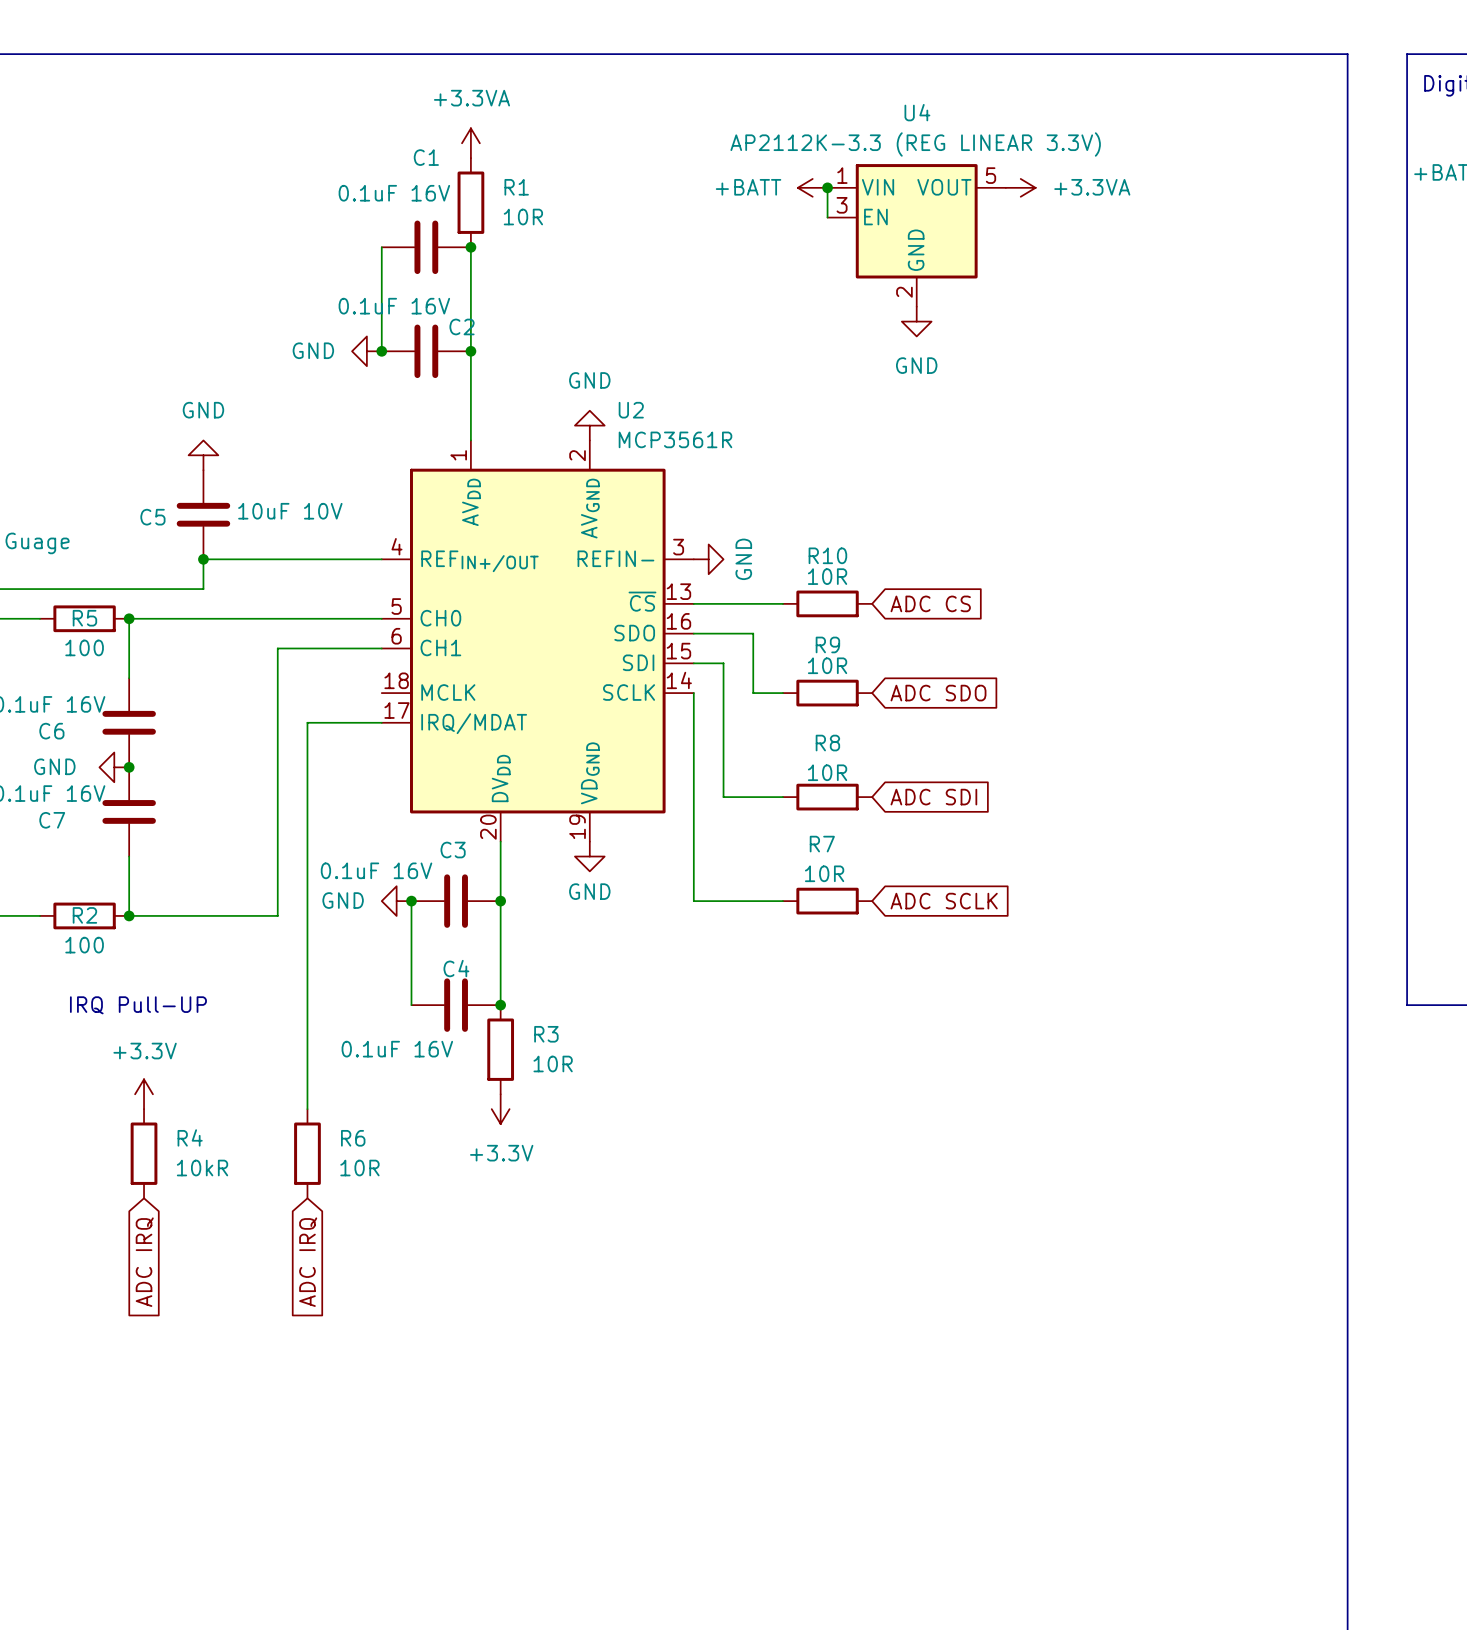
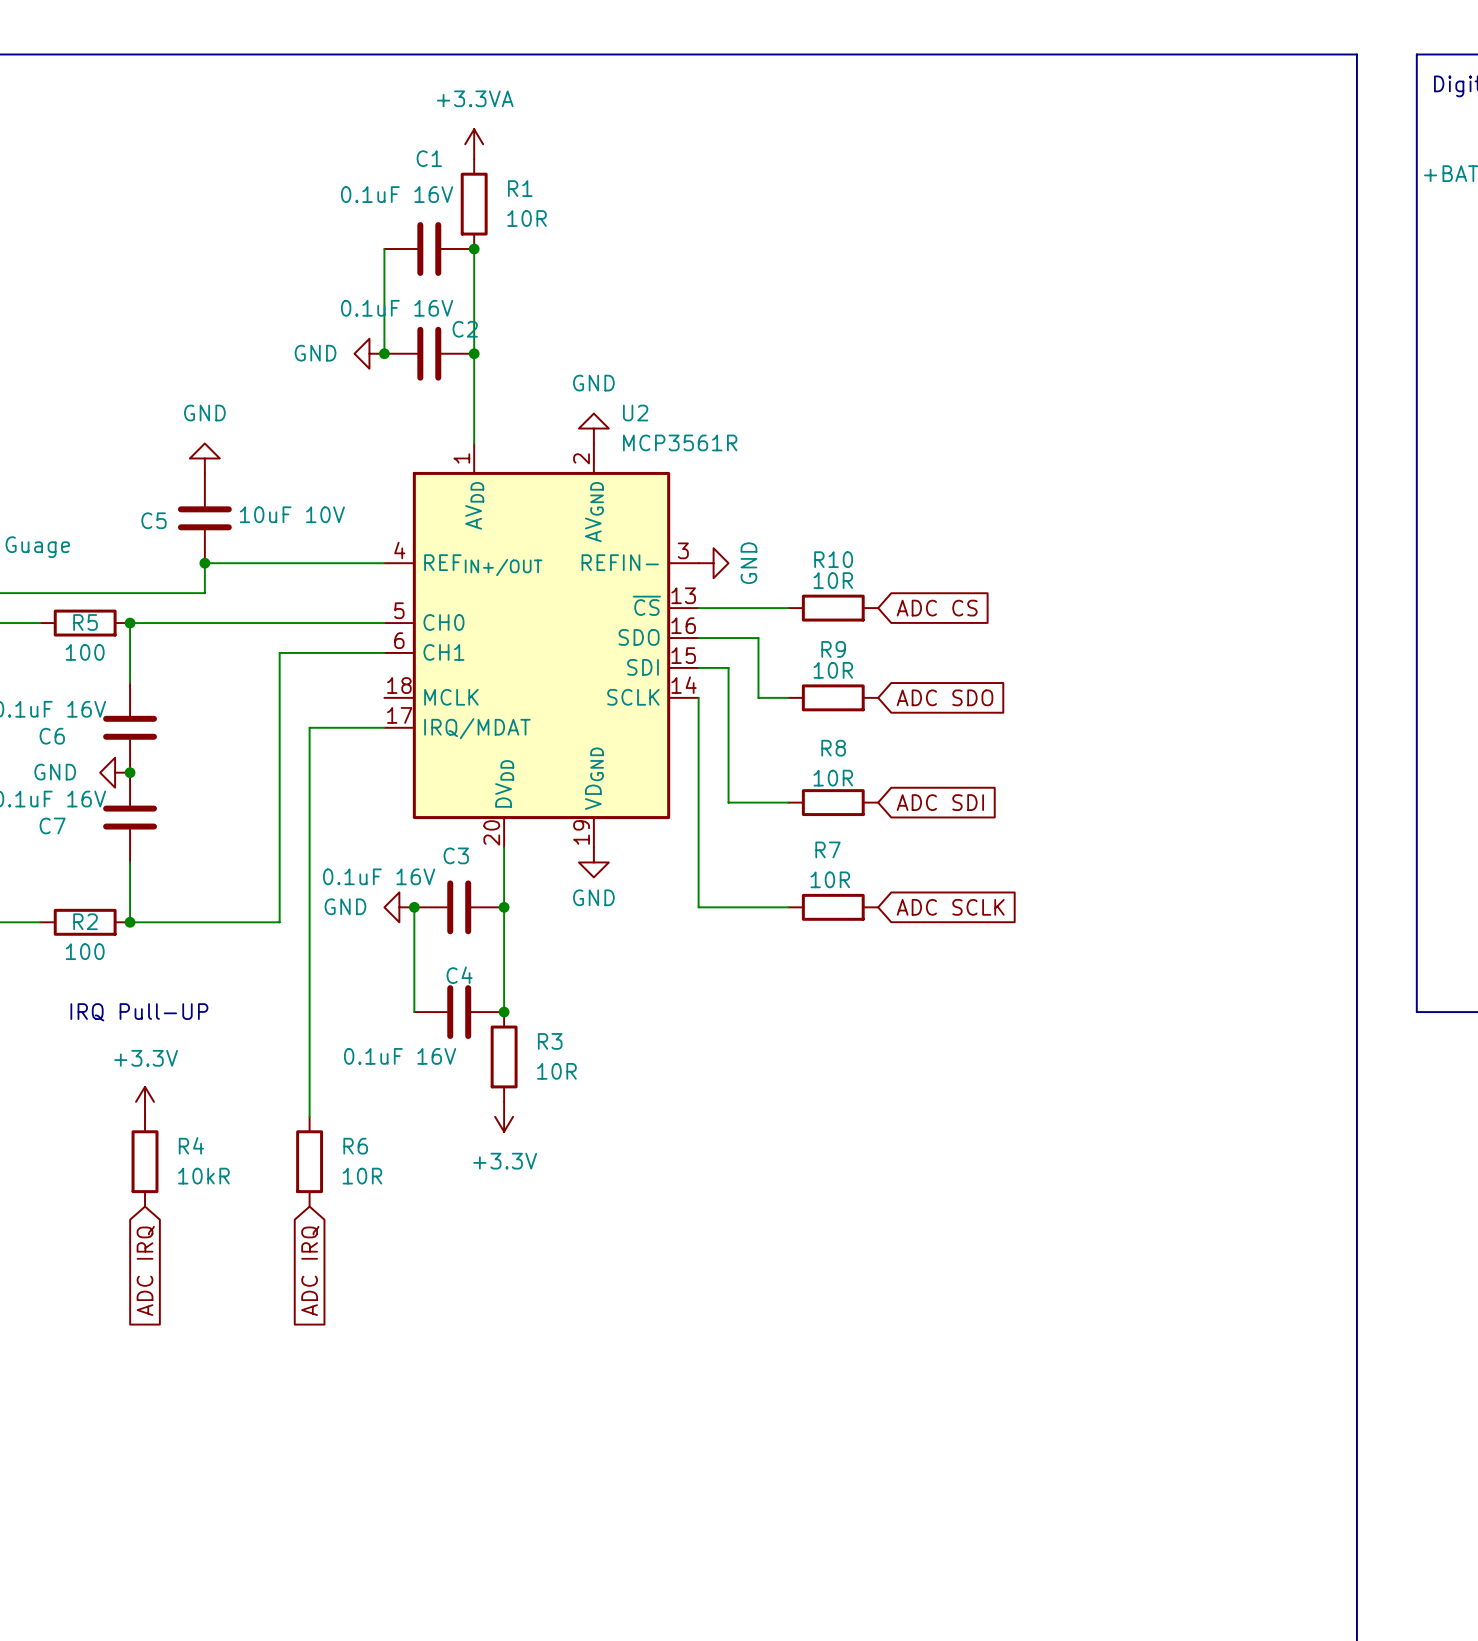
power symbol: +BATT (812, 187) -> none
wire: (827, 187) (827, 217) -> none
junction: (827, 187) -> none
power symbol: +3.3VA (1020, 187) -> none
U4: AP2112K-3.3 (REG LINEAR 3.3V) (916, 235) -> none
power symbol: GND (916, 321) -> none

